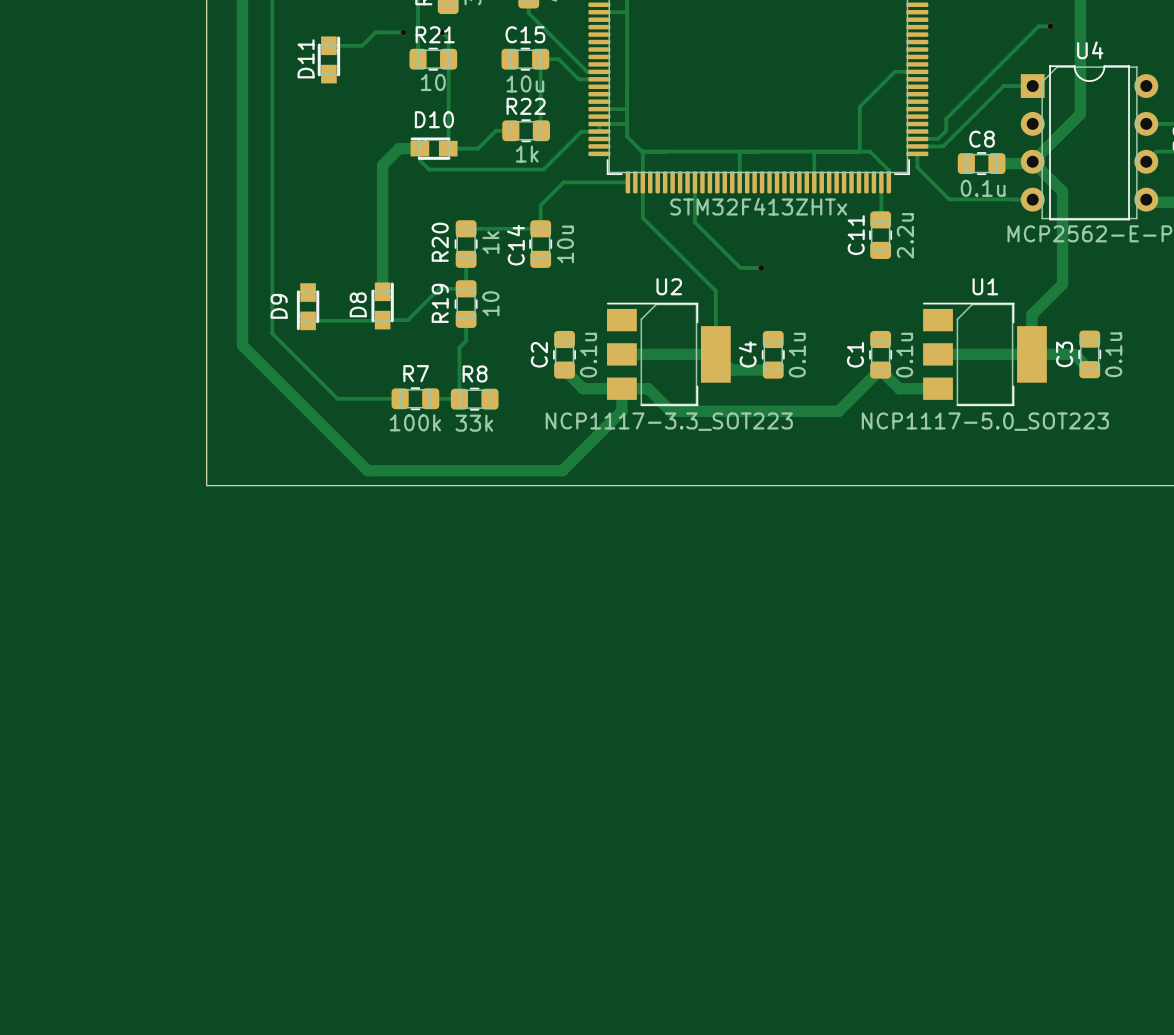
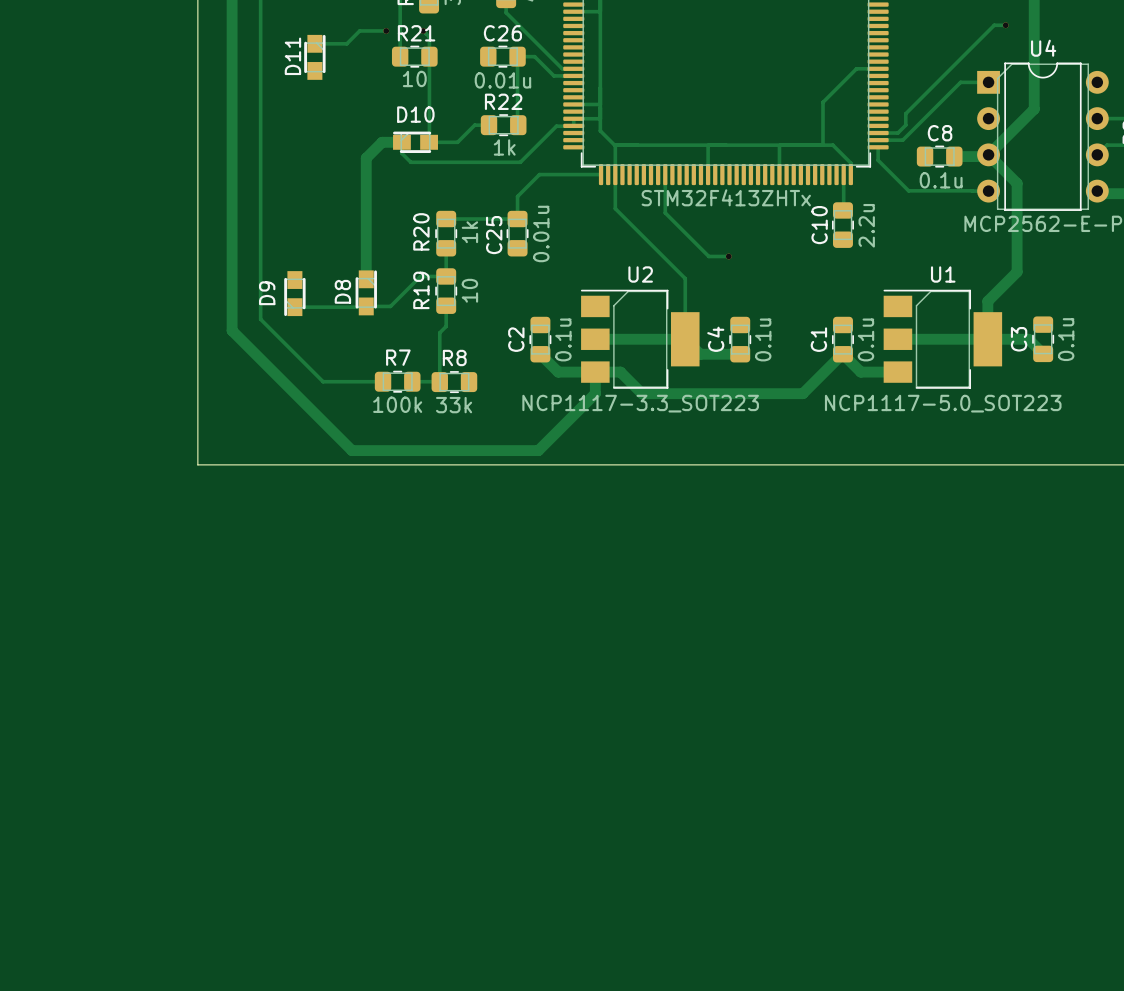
C15 name: C15 (525, 34) -> C26 (502, 33)
C15 value: 10u (525, 83) -> 0.01u (502, 80)
C11 name: C11 (856, 235) -> C10 (819, 225)
C14 value: 10u (565, 244) -> 0.01u (541, 233)
C14 name: C14 (515, 245) -> C25 (494, 235)

